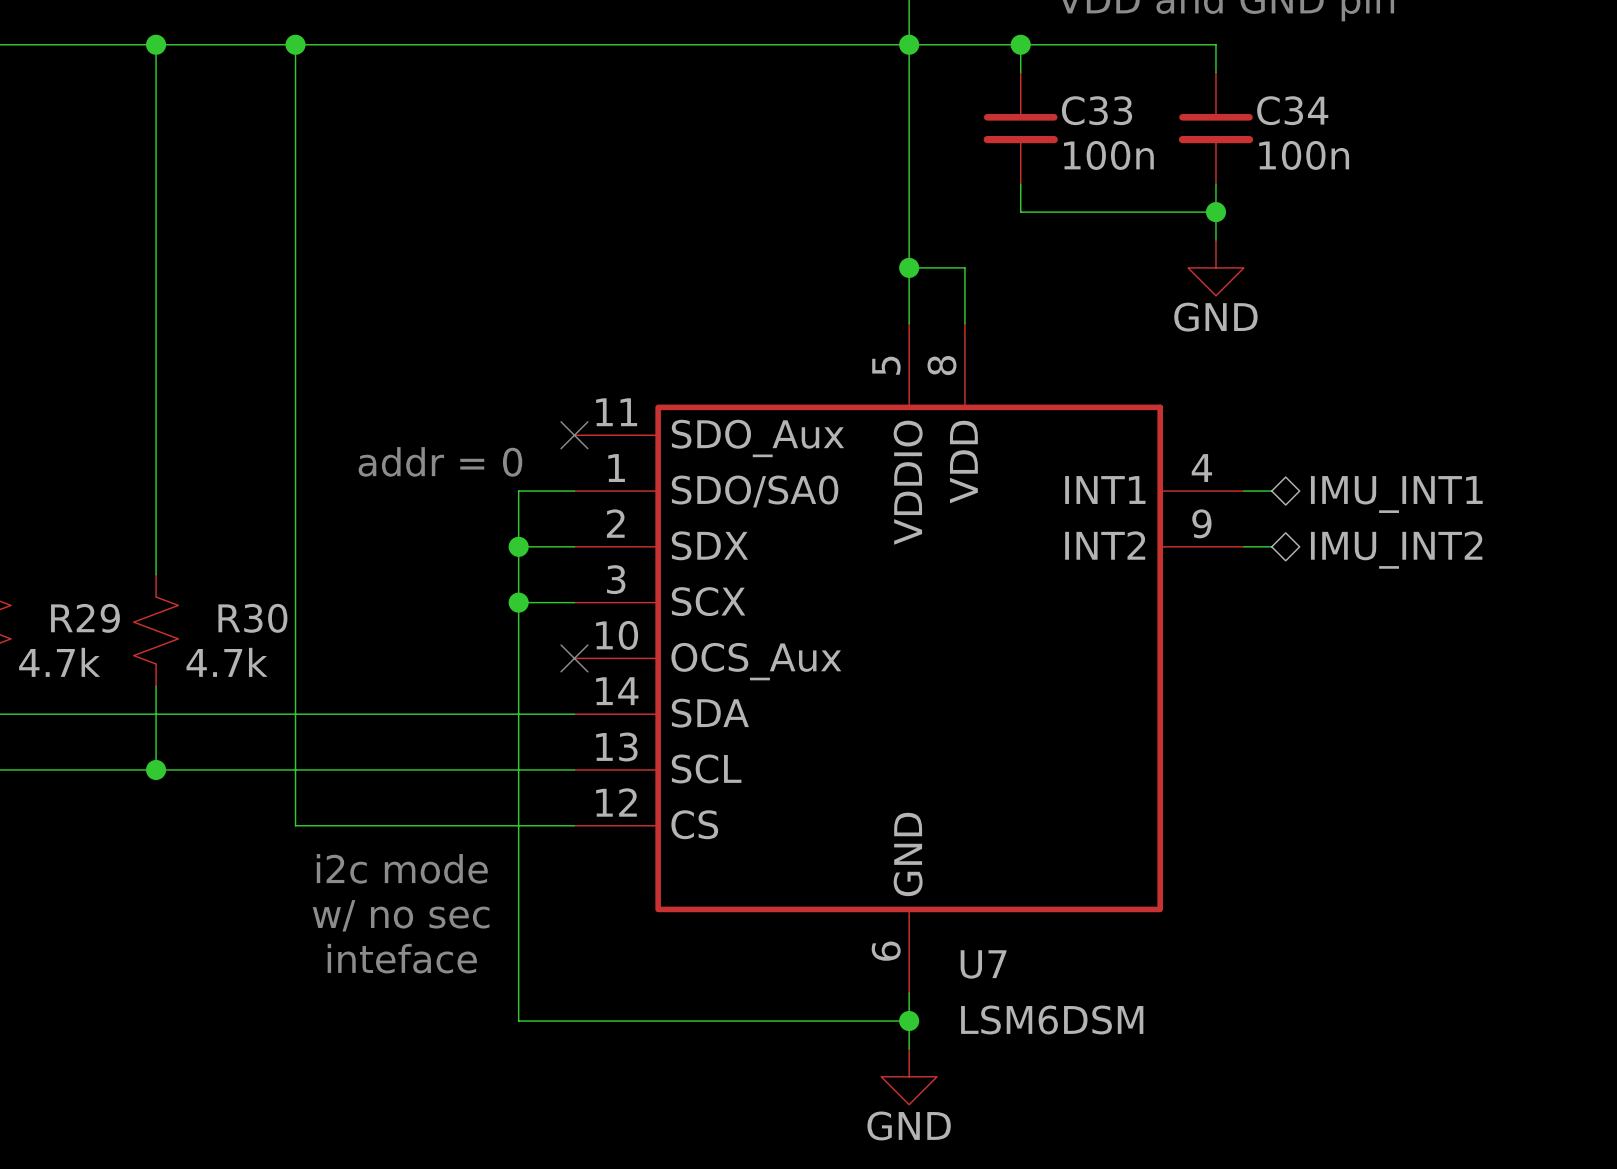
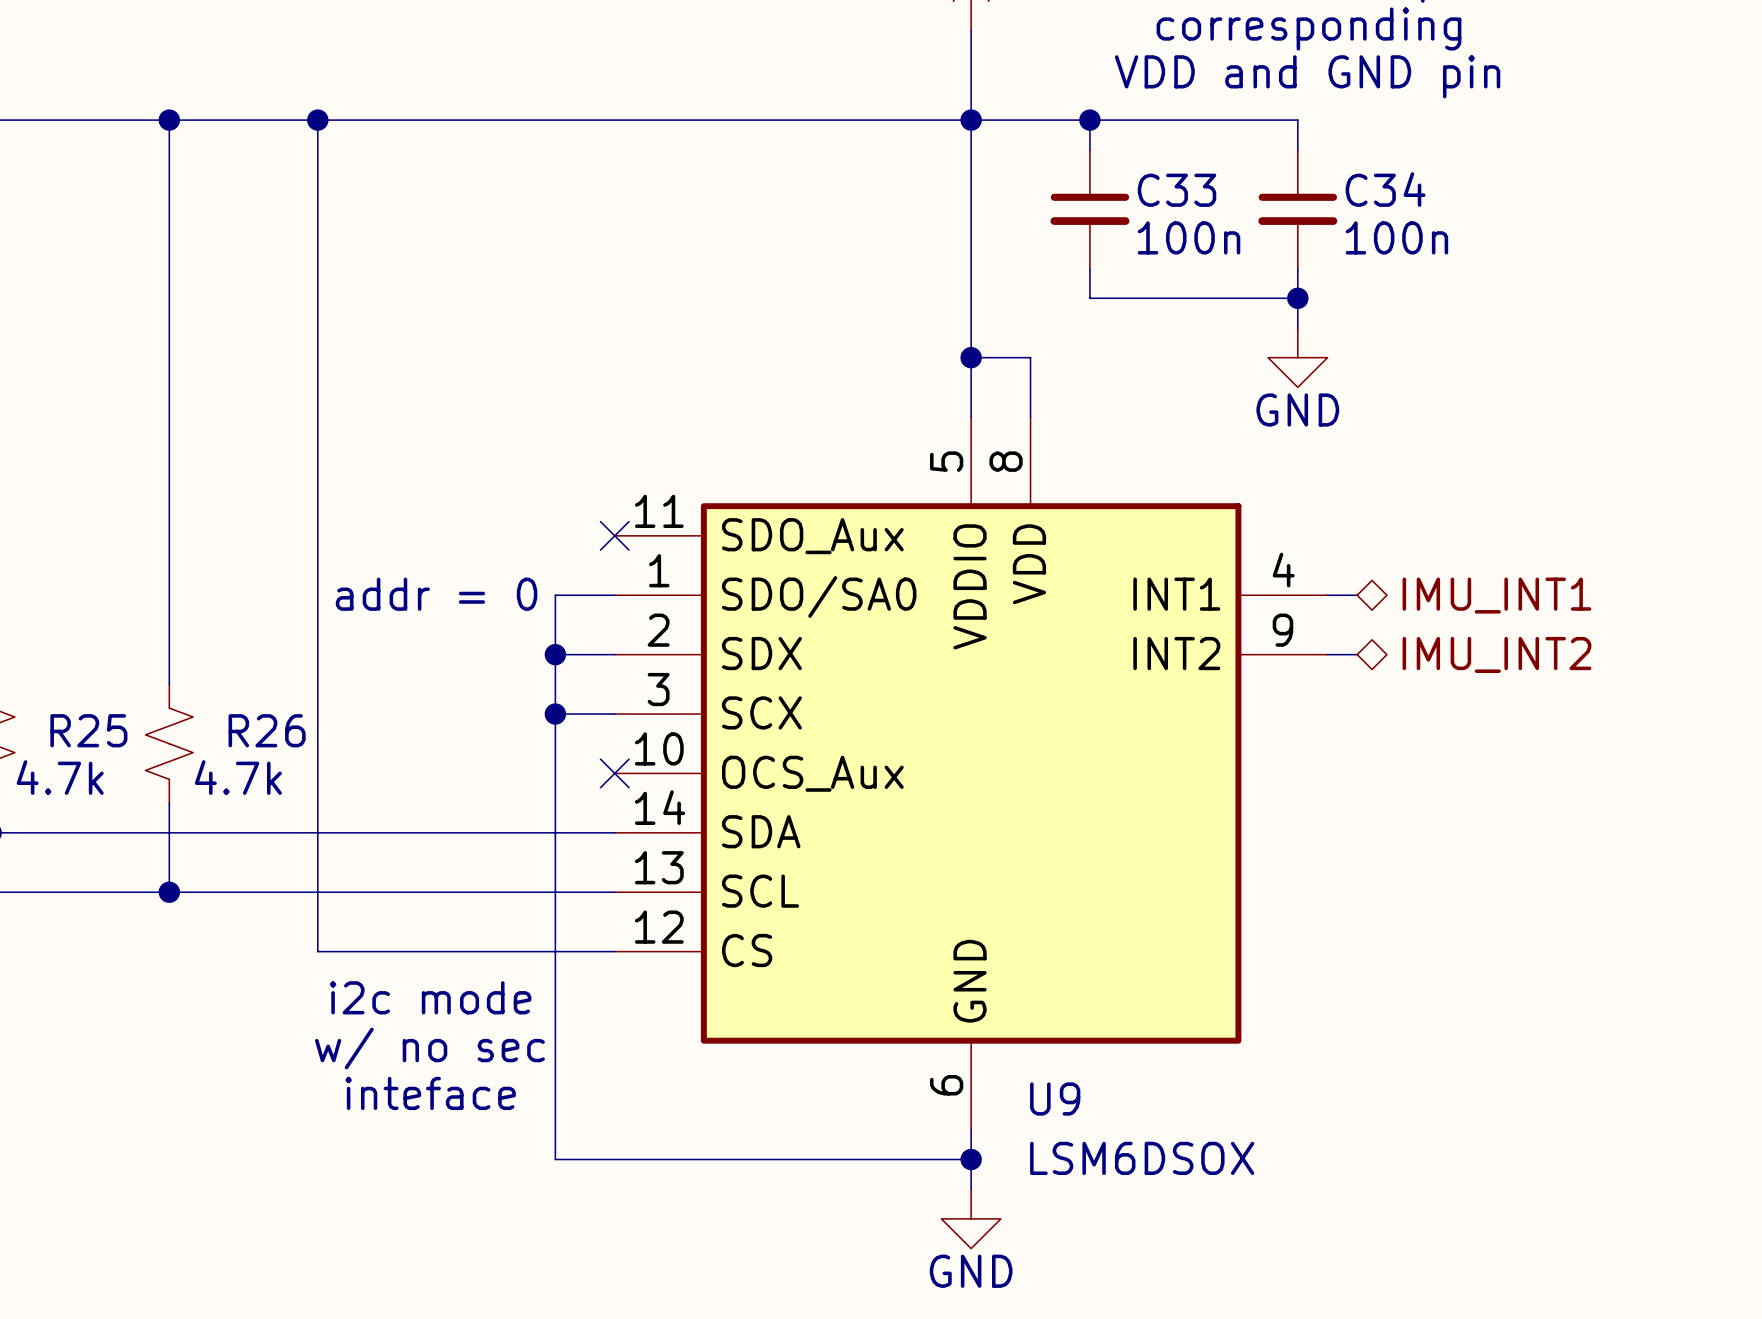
text position: addr = 0 (440, 461) -> addr = 0 (436, 594)
R29 name: R29 (85, 618) -> R25 (88, 730)
R30 name: R30 (252, 618) -> R26 (267, 730)
U7 name: U7 (983, 964) -> U9 (1055, 1099)
U7 value: LSM6DSM (1052, 1019) -> LSM6DSOX (1142, 1158)

